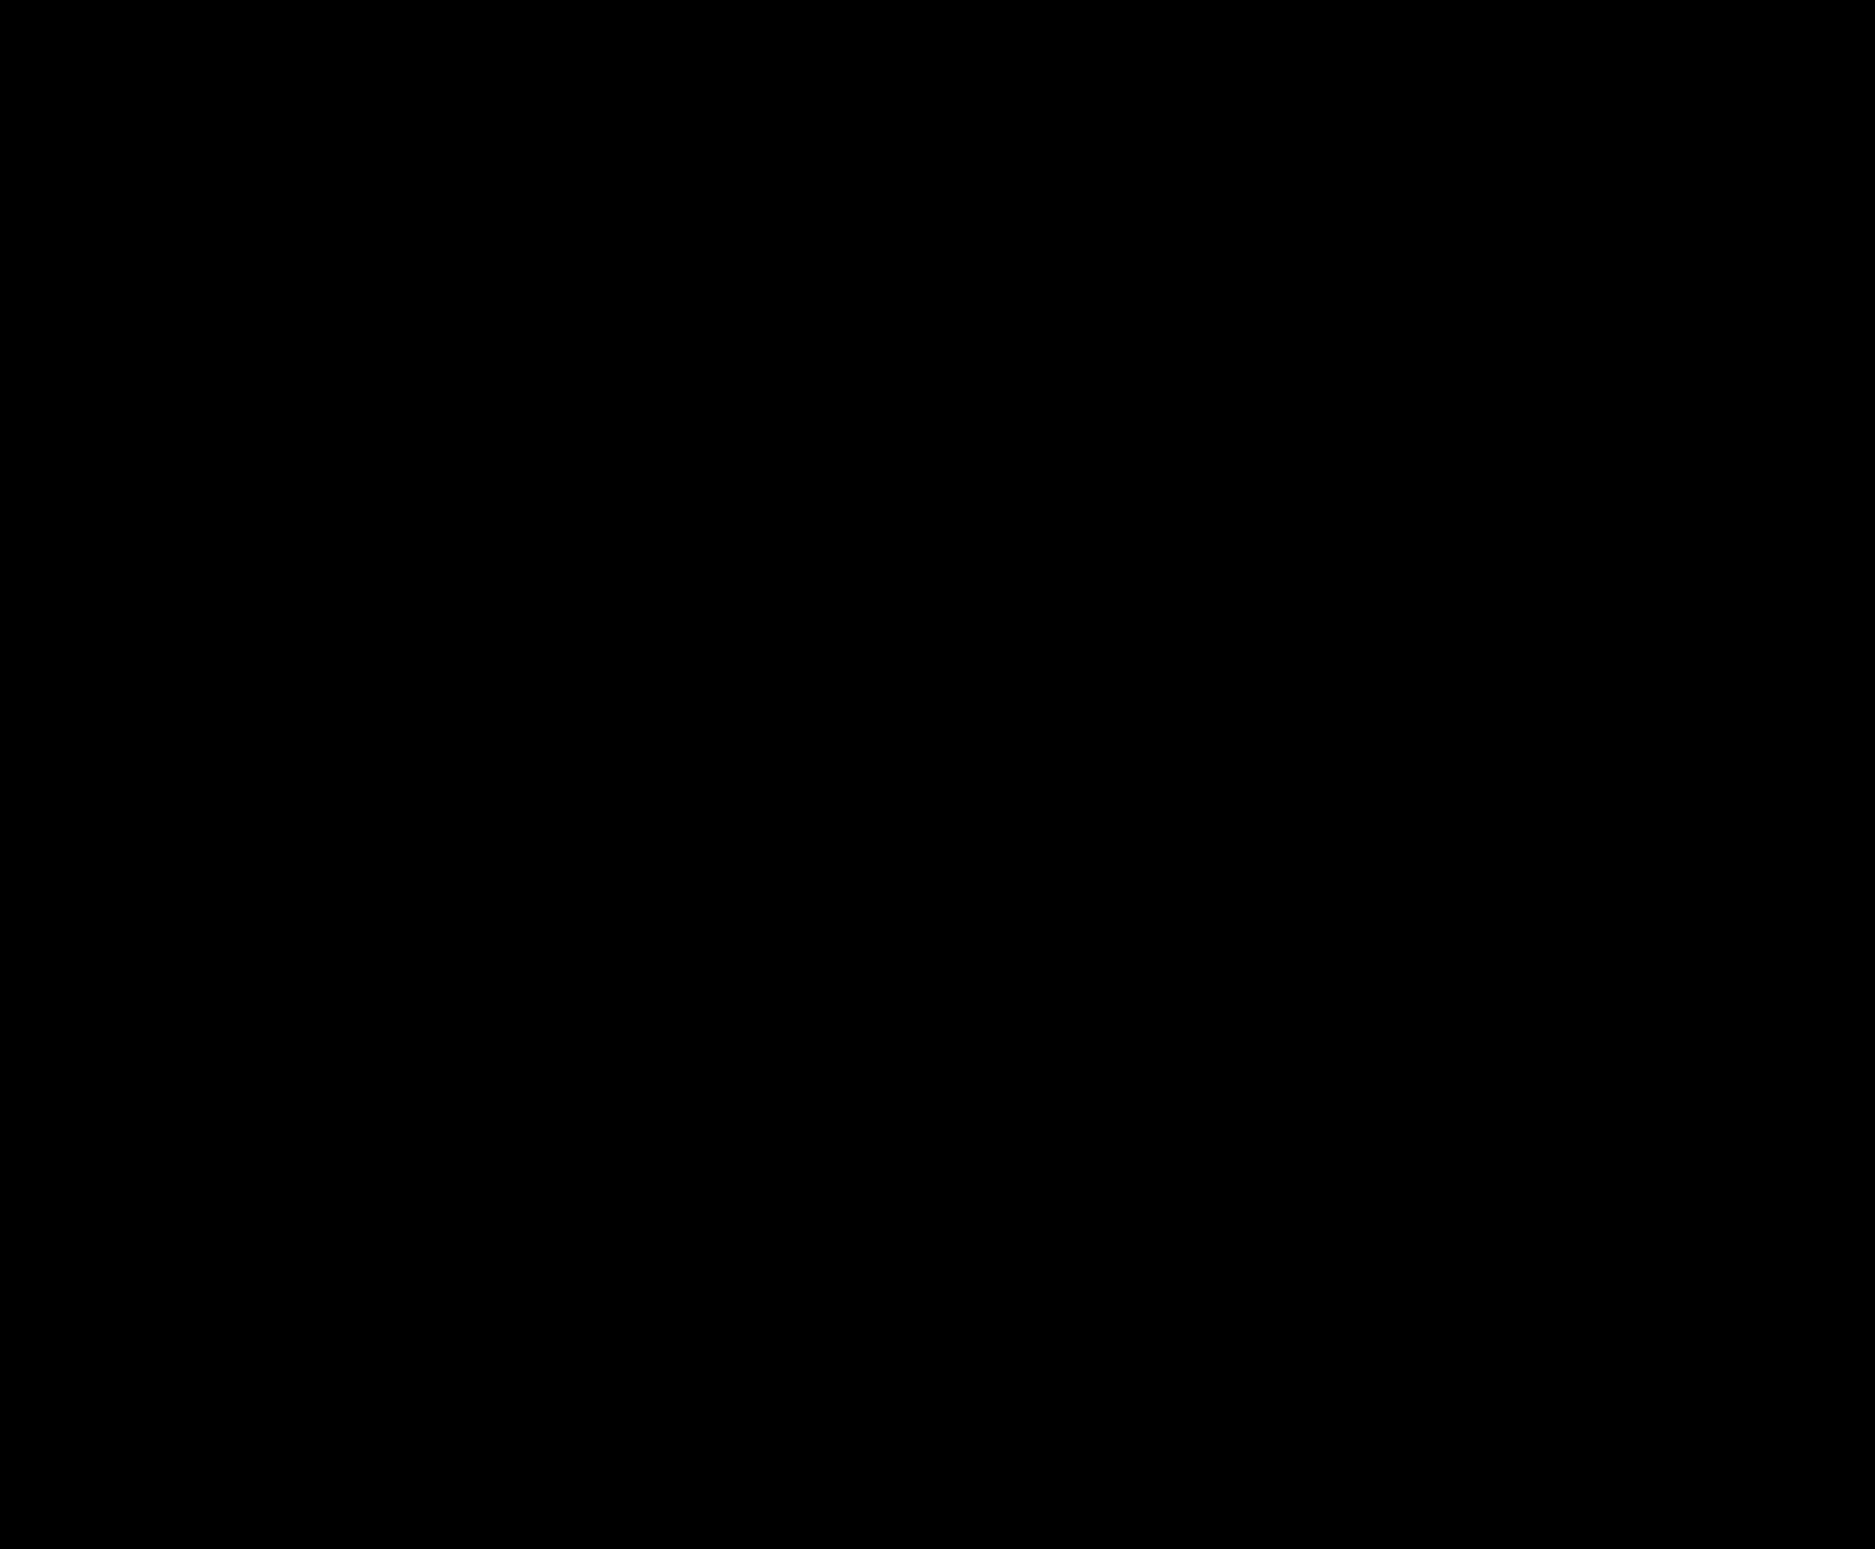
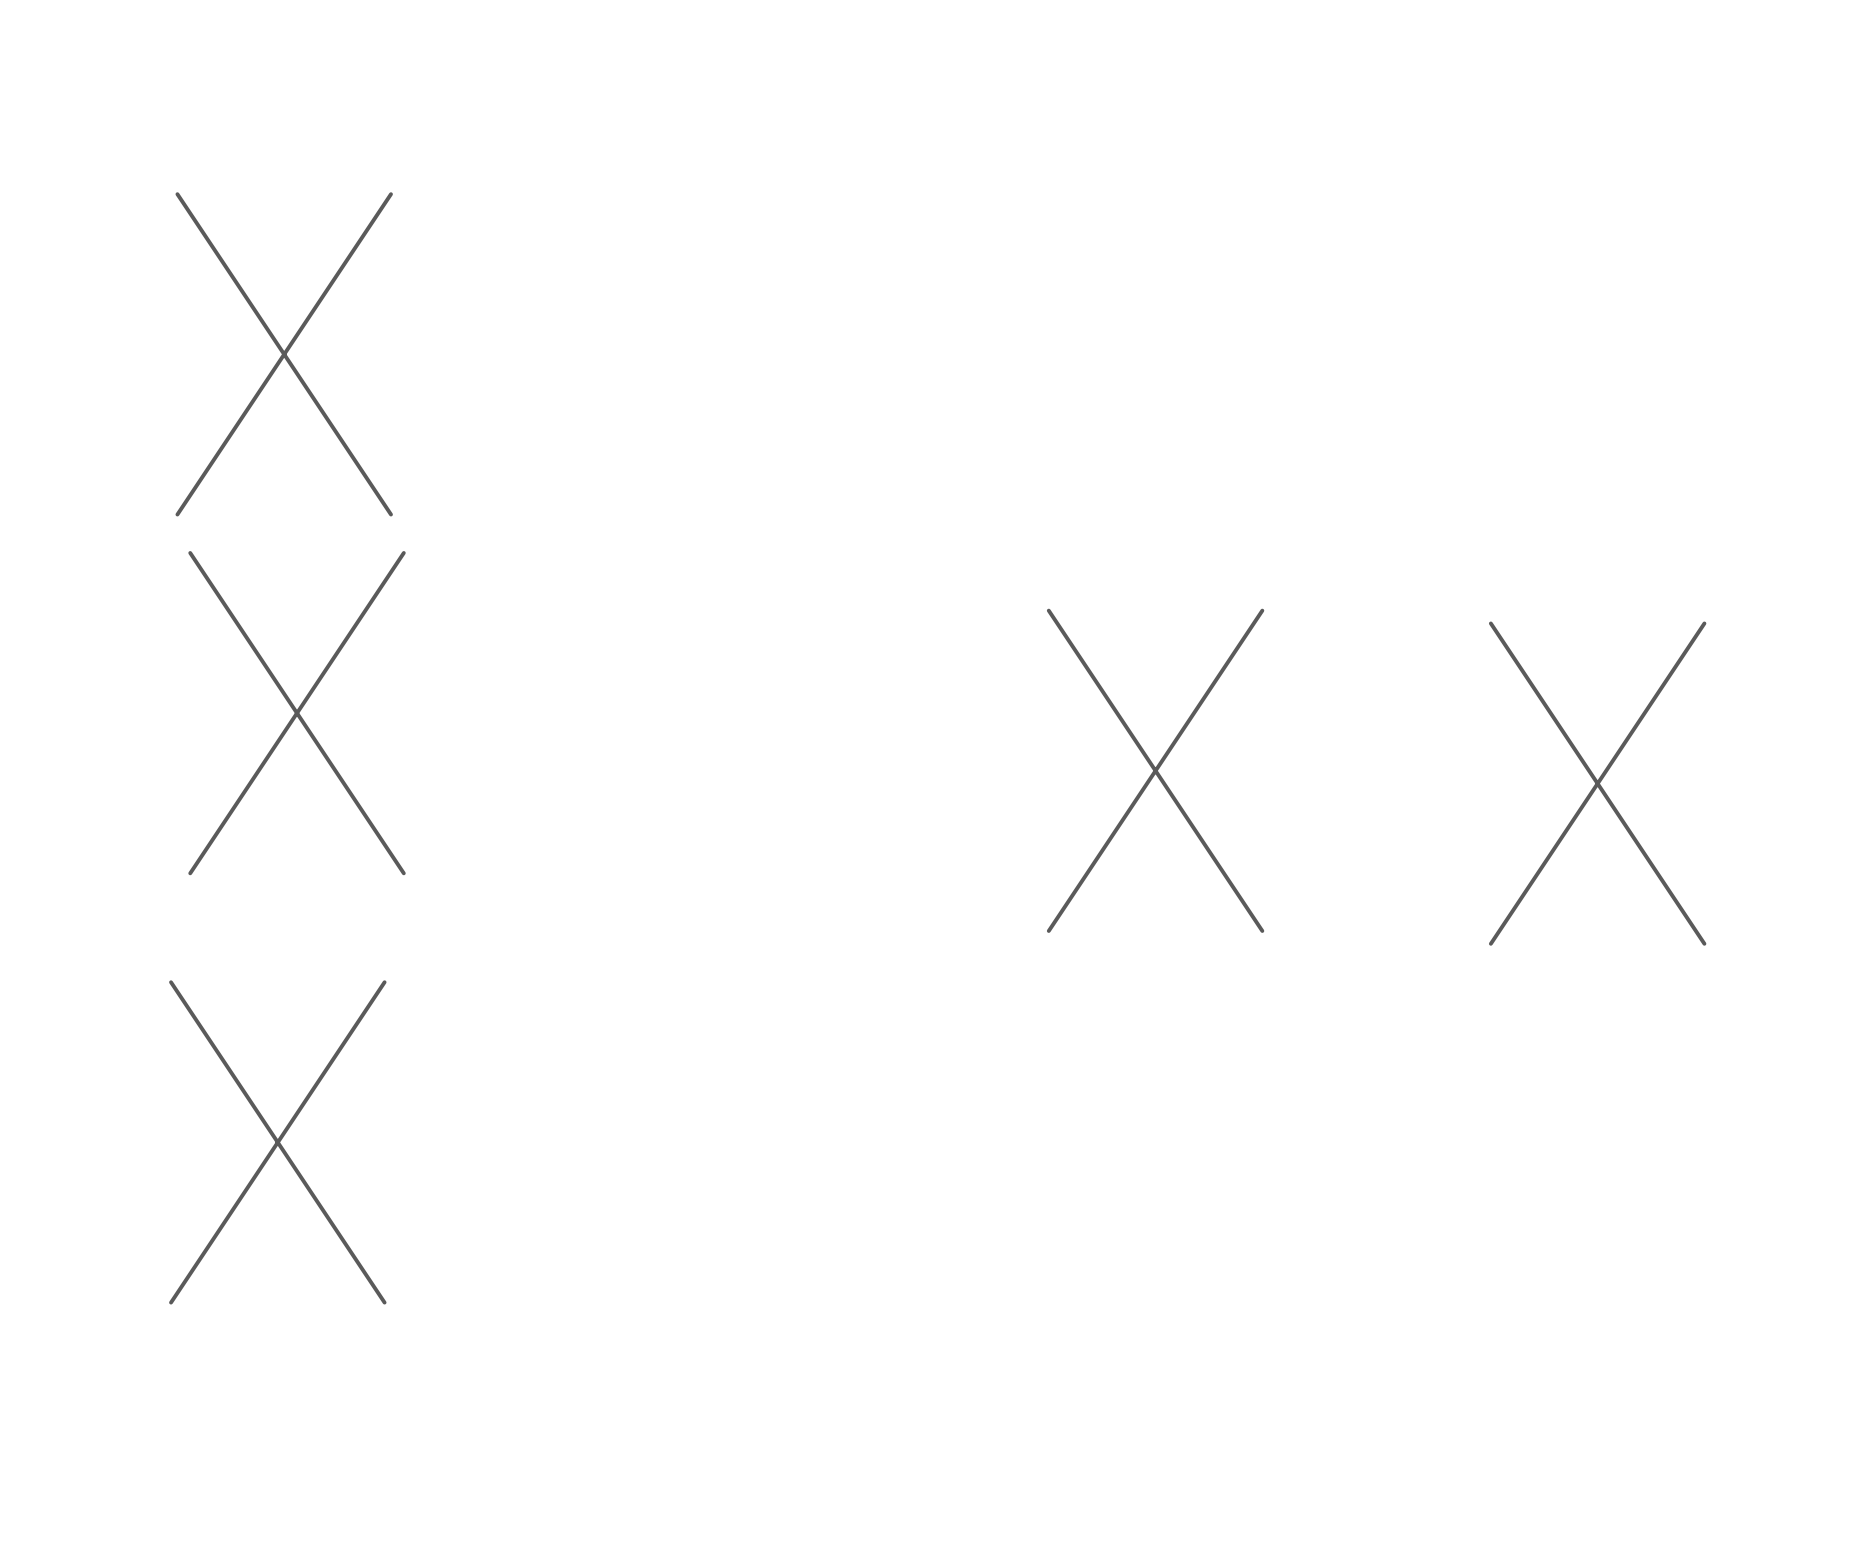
text: none -> X (284, 354)
text: none -> X (297, 713)
text: none -> X (1155, 770)
text: none -> X (1597, 783)
text: none -> X (277, 1142)

